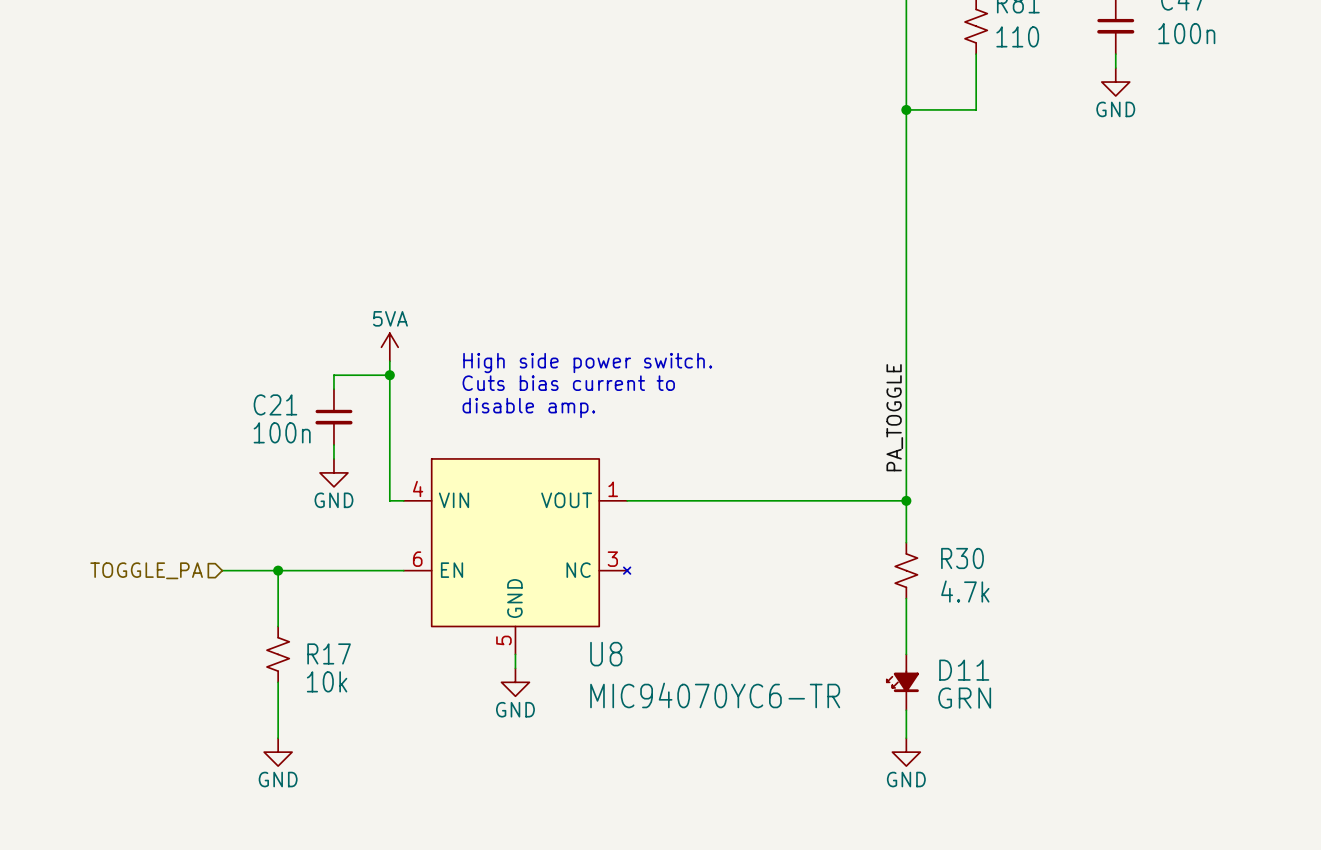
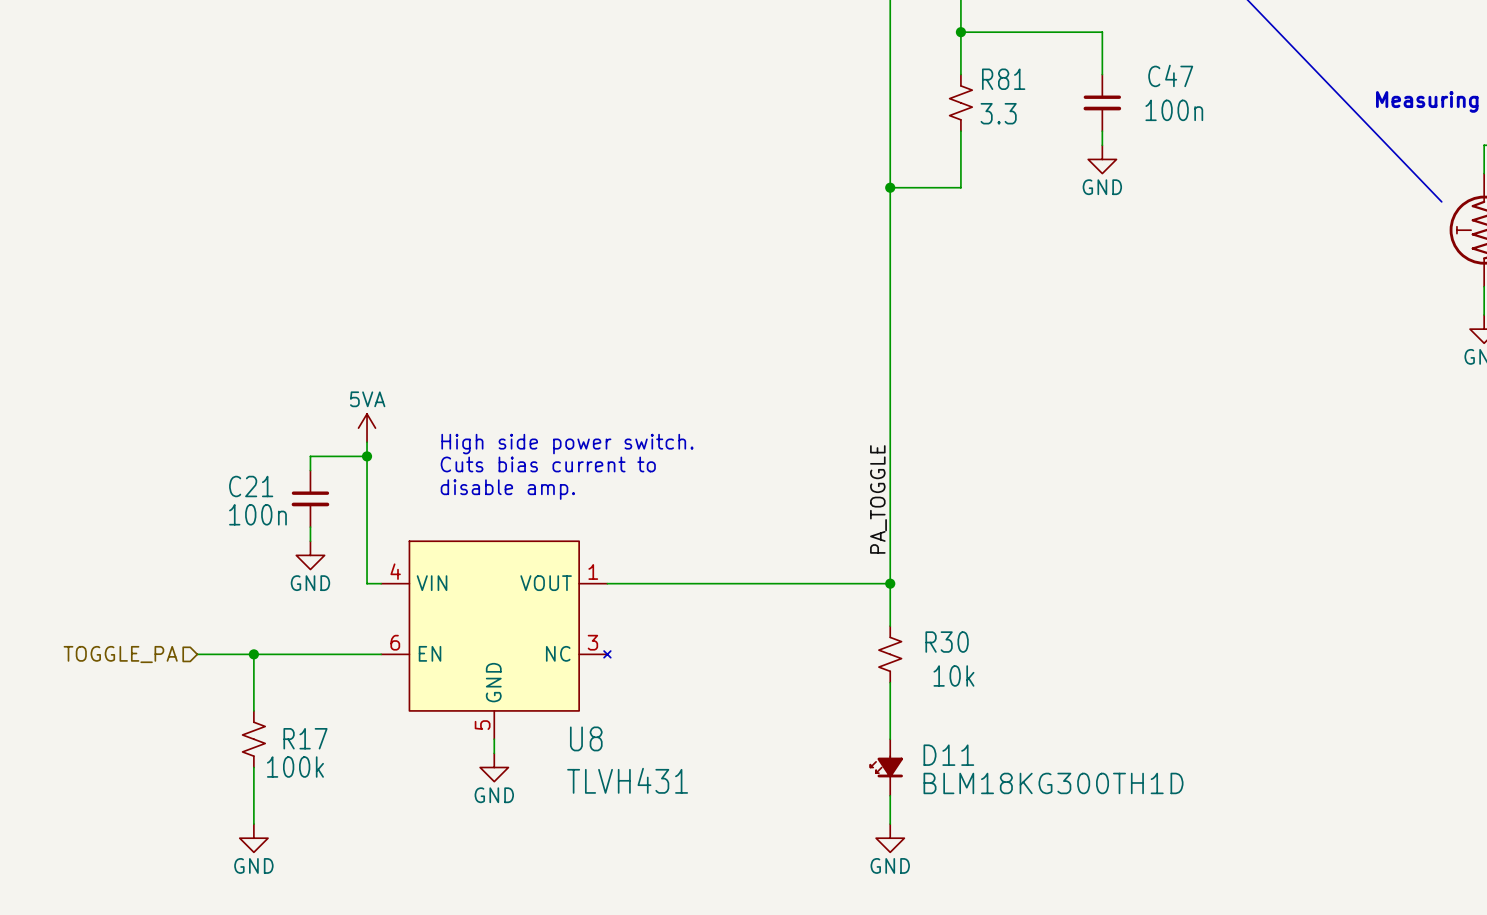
R81 value: 110 (1017, 36) -> 3.3 (998, 113)
R30 value: 4.7k (965, 591) -> 10k (953, 675)
R17 value: 10k (327, 681) -> 100k (295, 767)
U8 value: MIC94070YC6-TR (715, 695) -> TLVH431 (627, 780)
D11 value: GRN (964, 698) -> BLM18KG300TH1D (1053, 783)

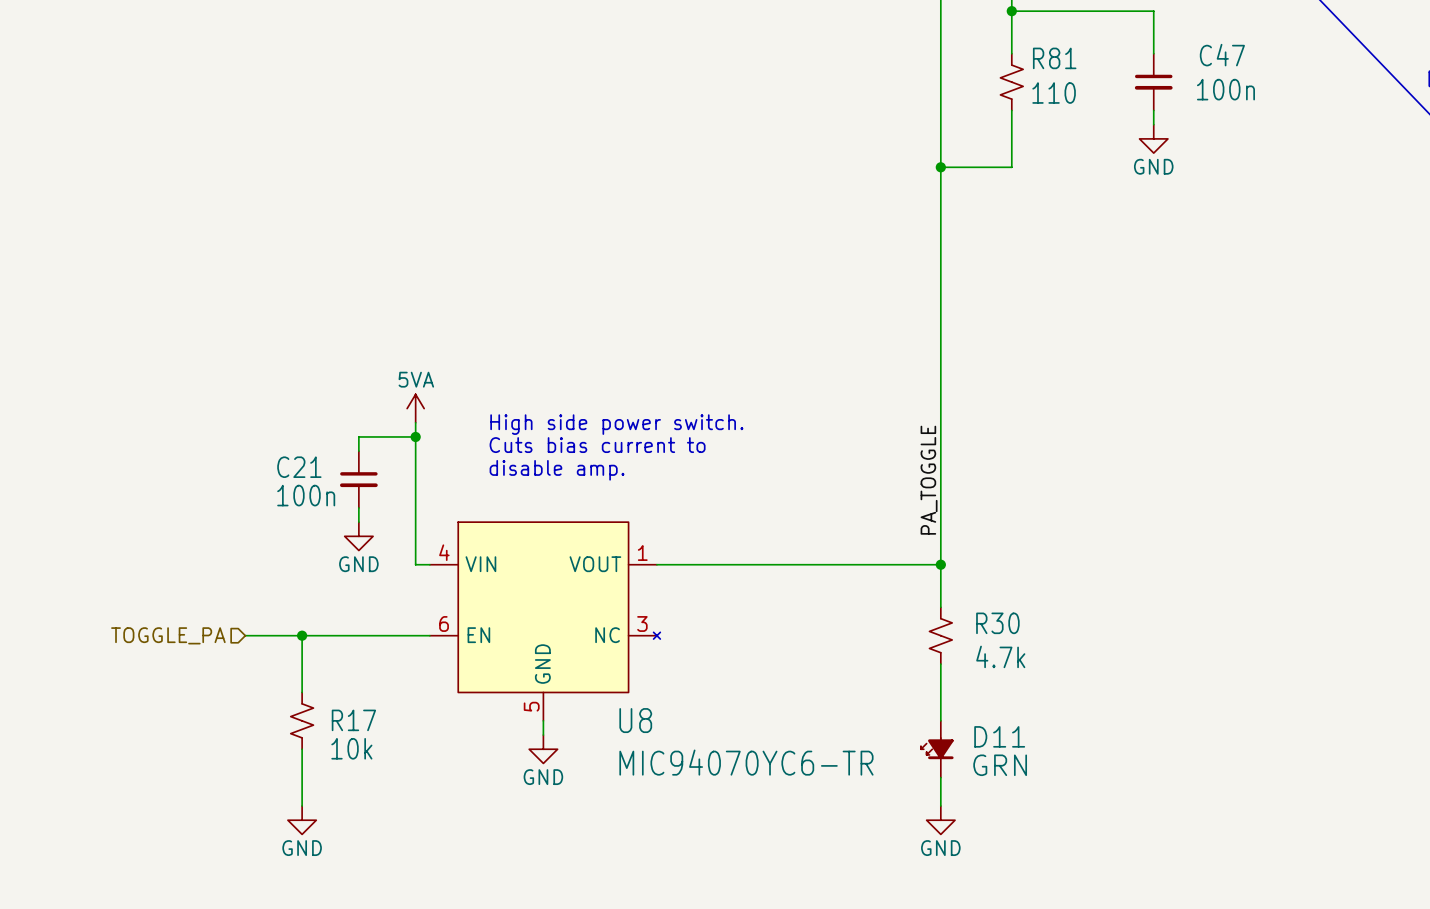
R81 value: 3.3 (998, 113) -> 110 (1054, 93)
R30 value: 10k (953, 675) -> 4.7k (1000, 656)
R17 value: 100k (295, 767) -> 10k (351, 748)
U8 value: TLVH431 (627, 780) -> MIC94070YC6-TR (746, 762)
D11 value: BLM18KG300TH1D (1053, 783) -> GRN (1000, 765)

